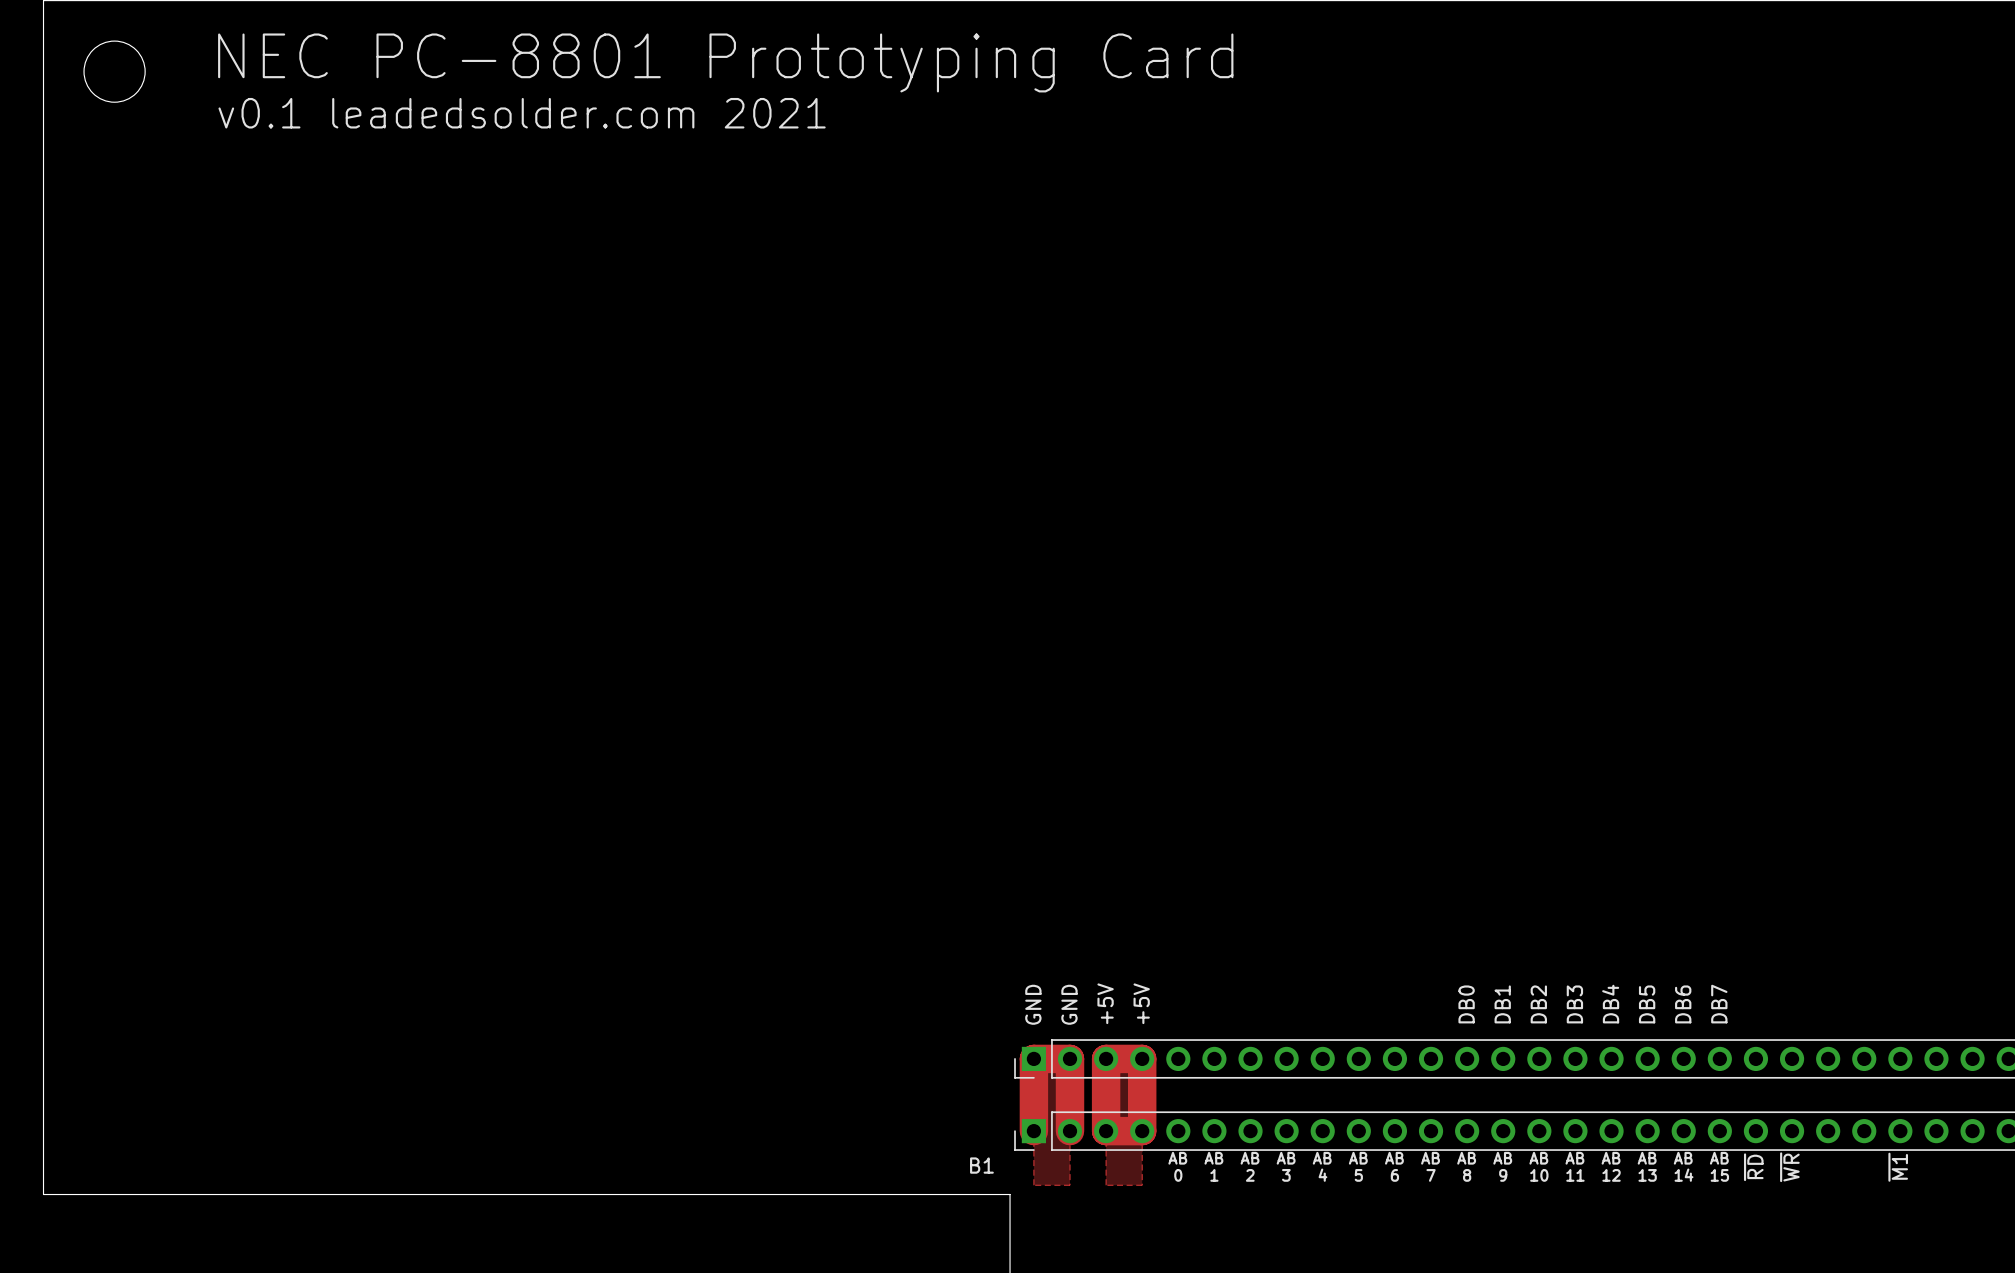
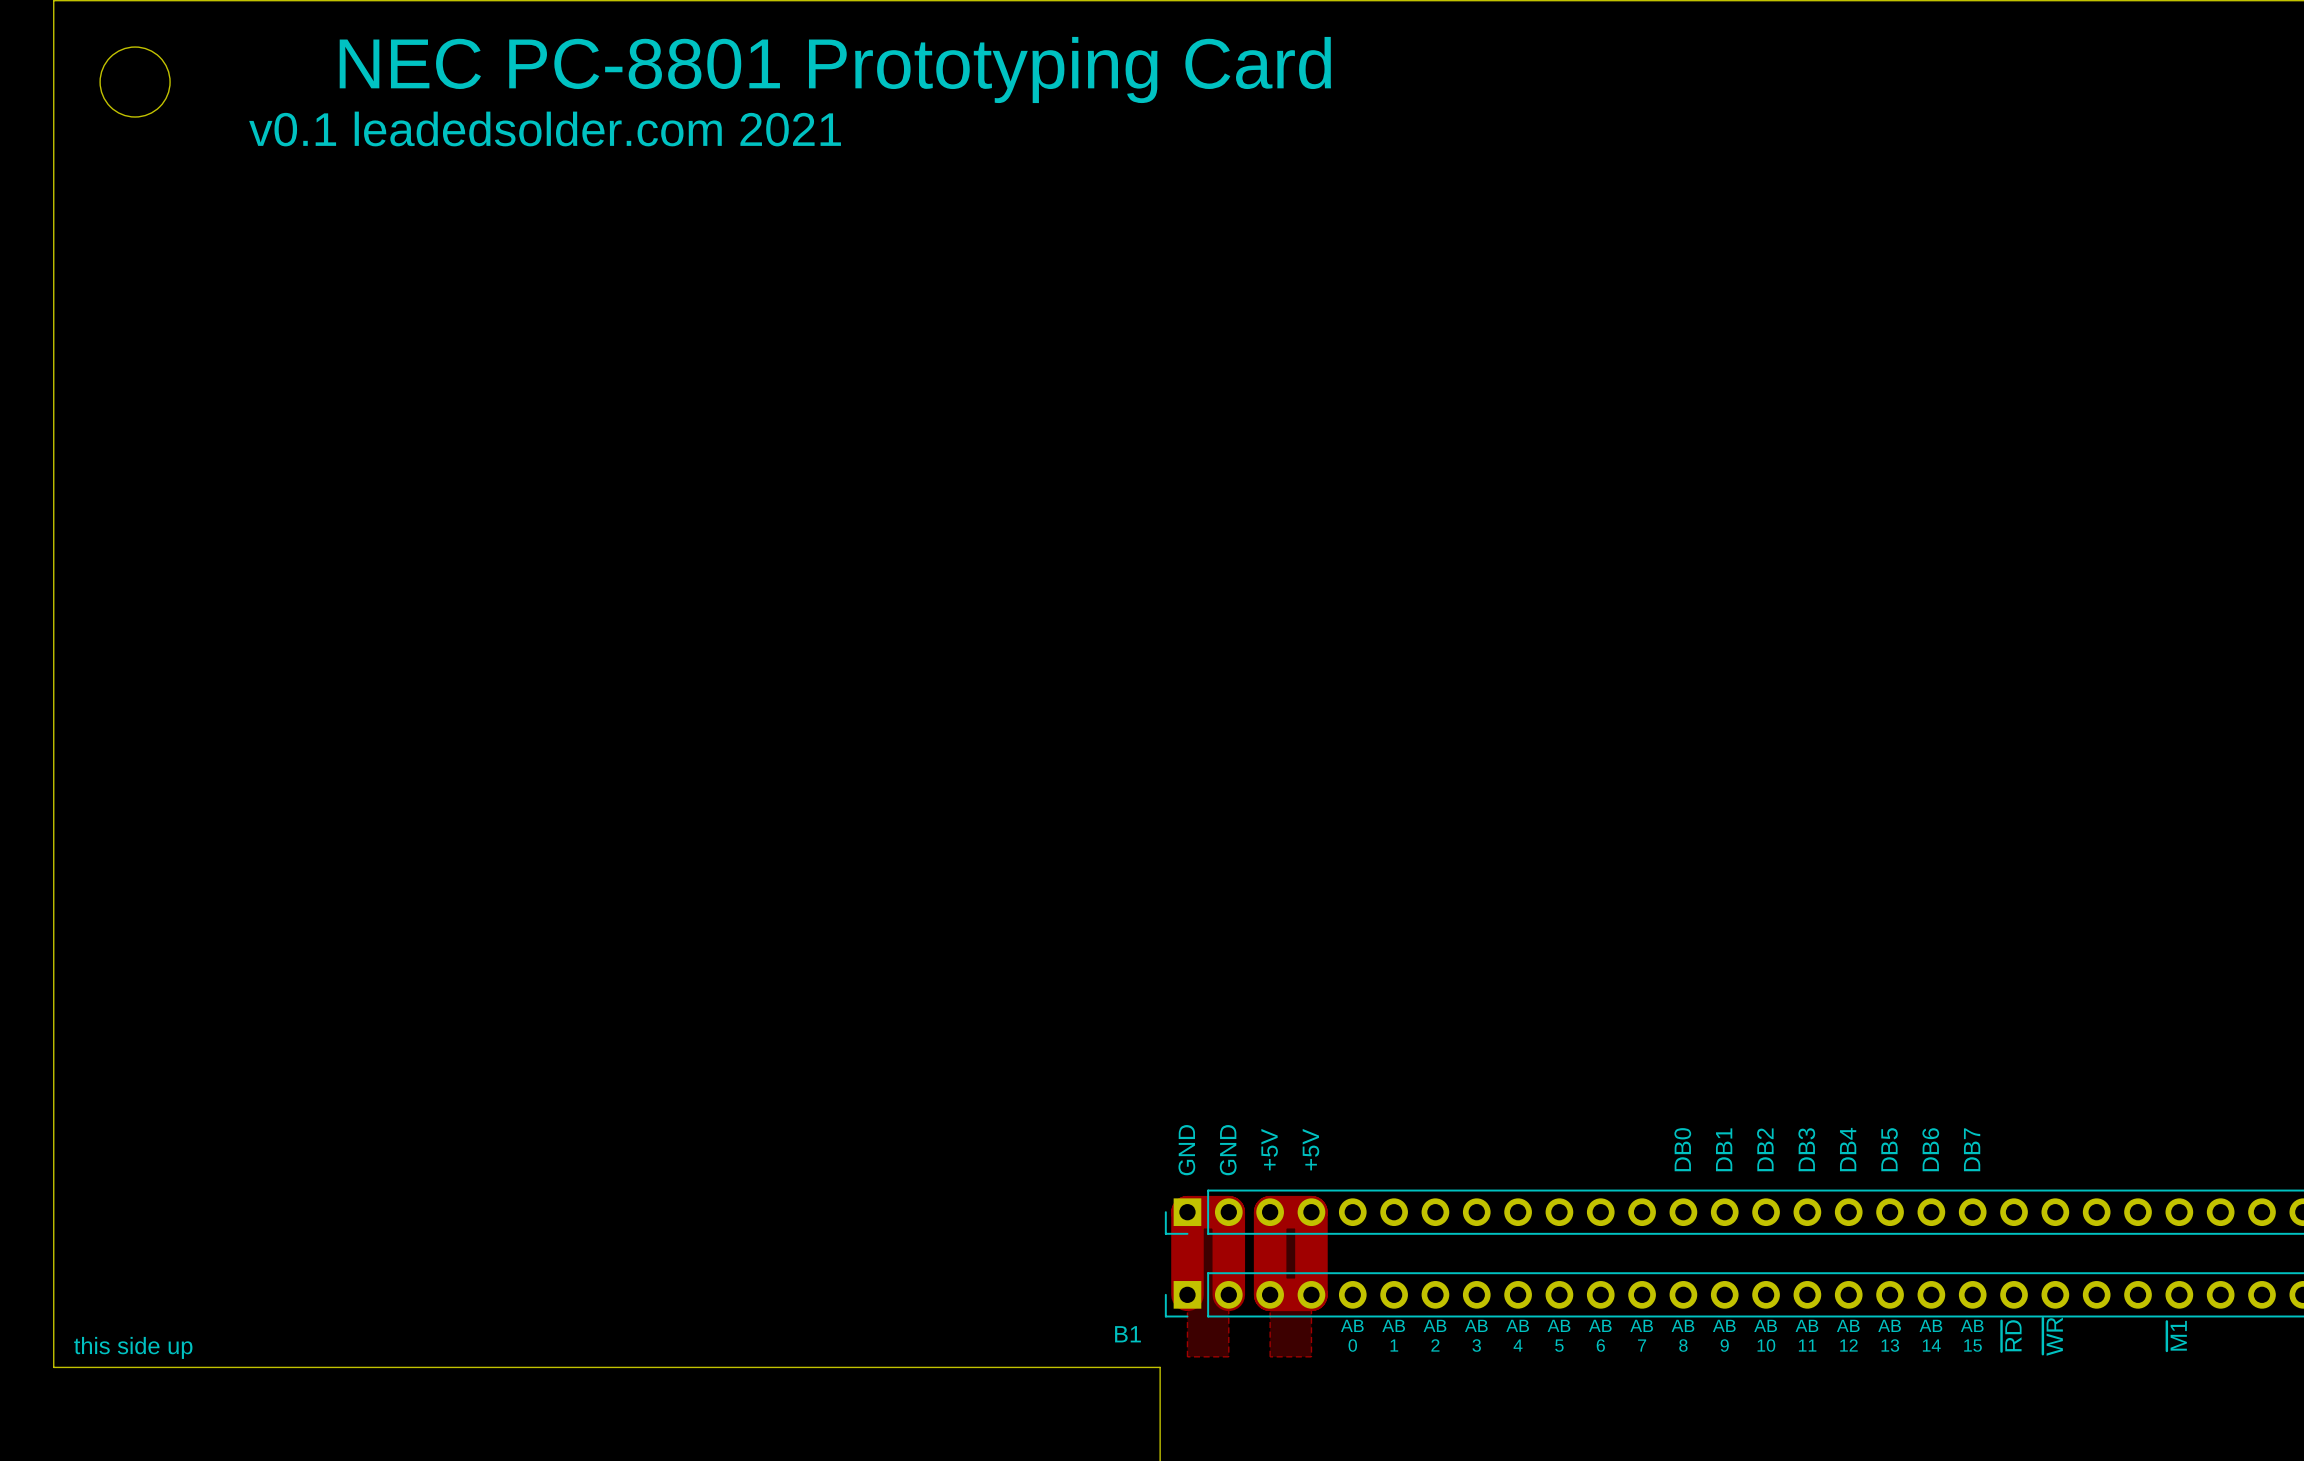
text: none -> this side up (133, 1347)

